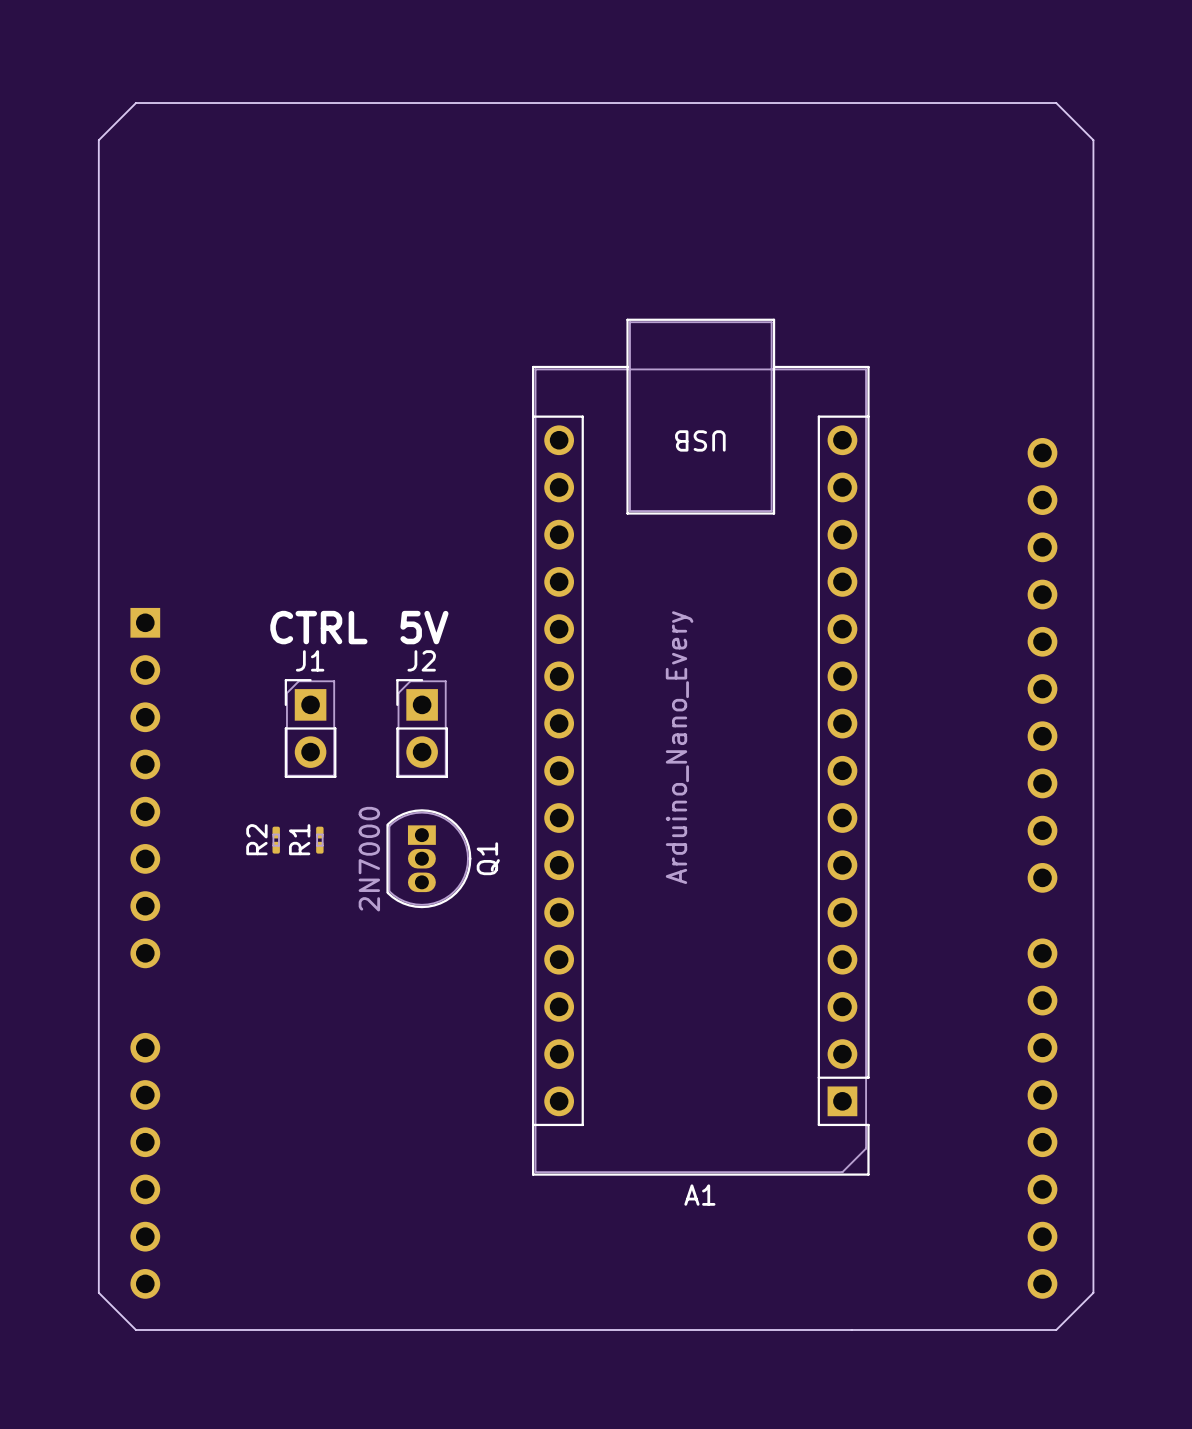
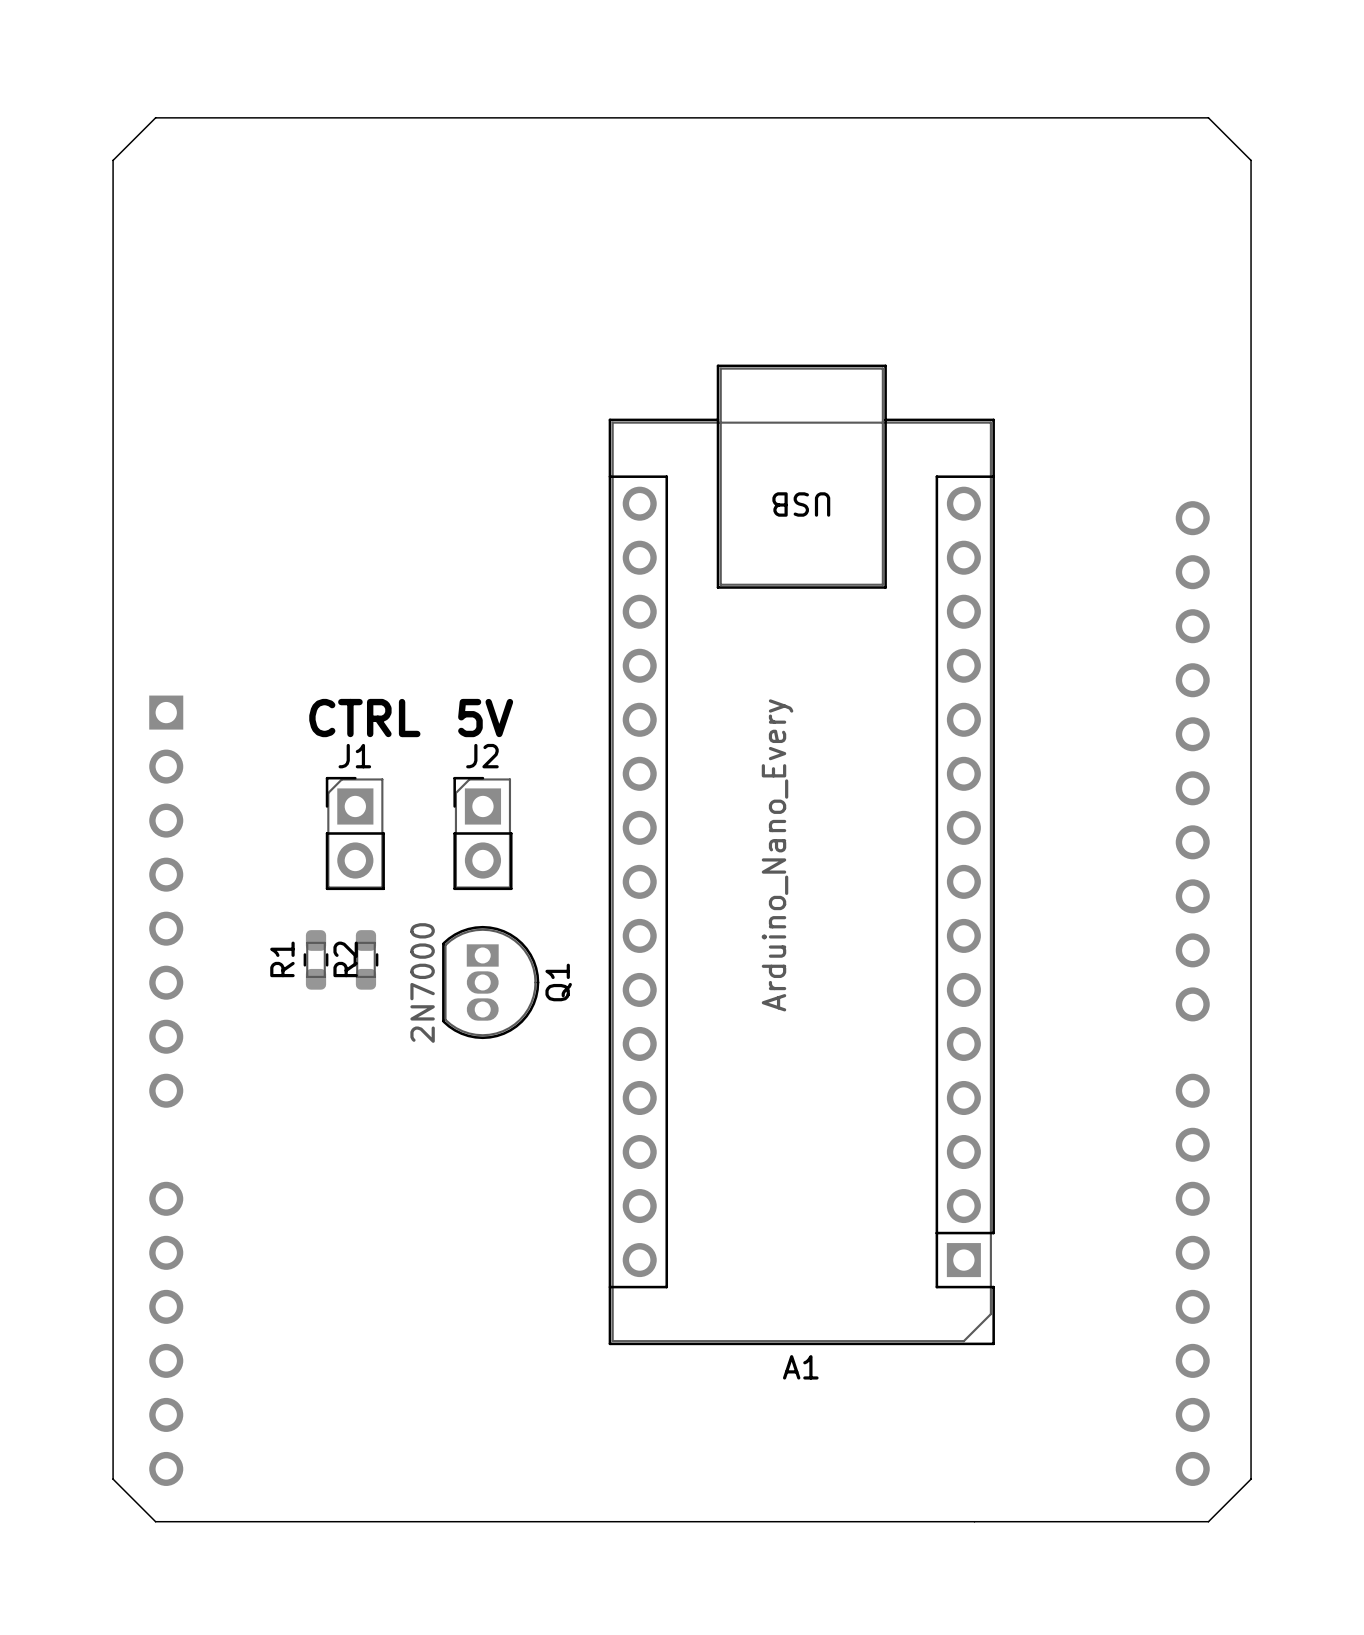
R2 footprint: [272, 826, 280, 854] -> [303, 930, 329, 990]
R1 footprint: [316, 826, 324, 854] -> [353, 930, 379, 990]
R2 name position: R2 (256, 839) -> R2 (345, 959)
R1 name position: R1 (299, 839) -> R1 (282, 959)

